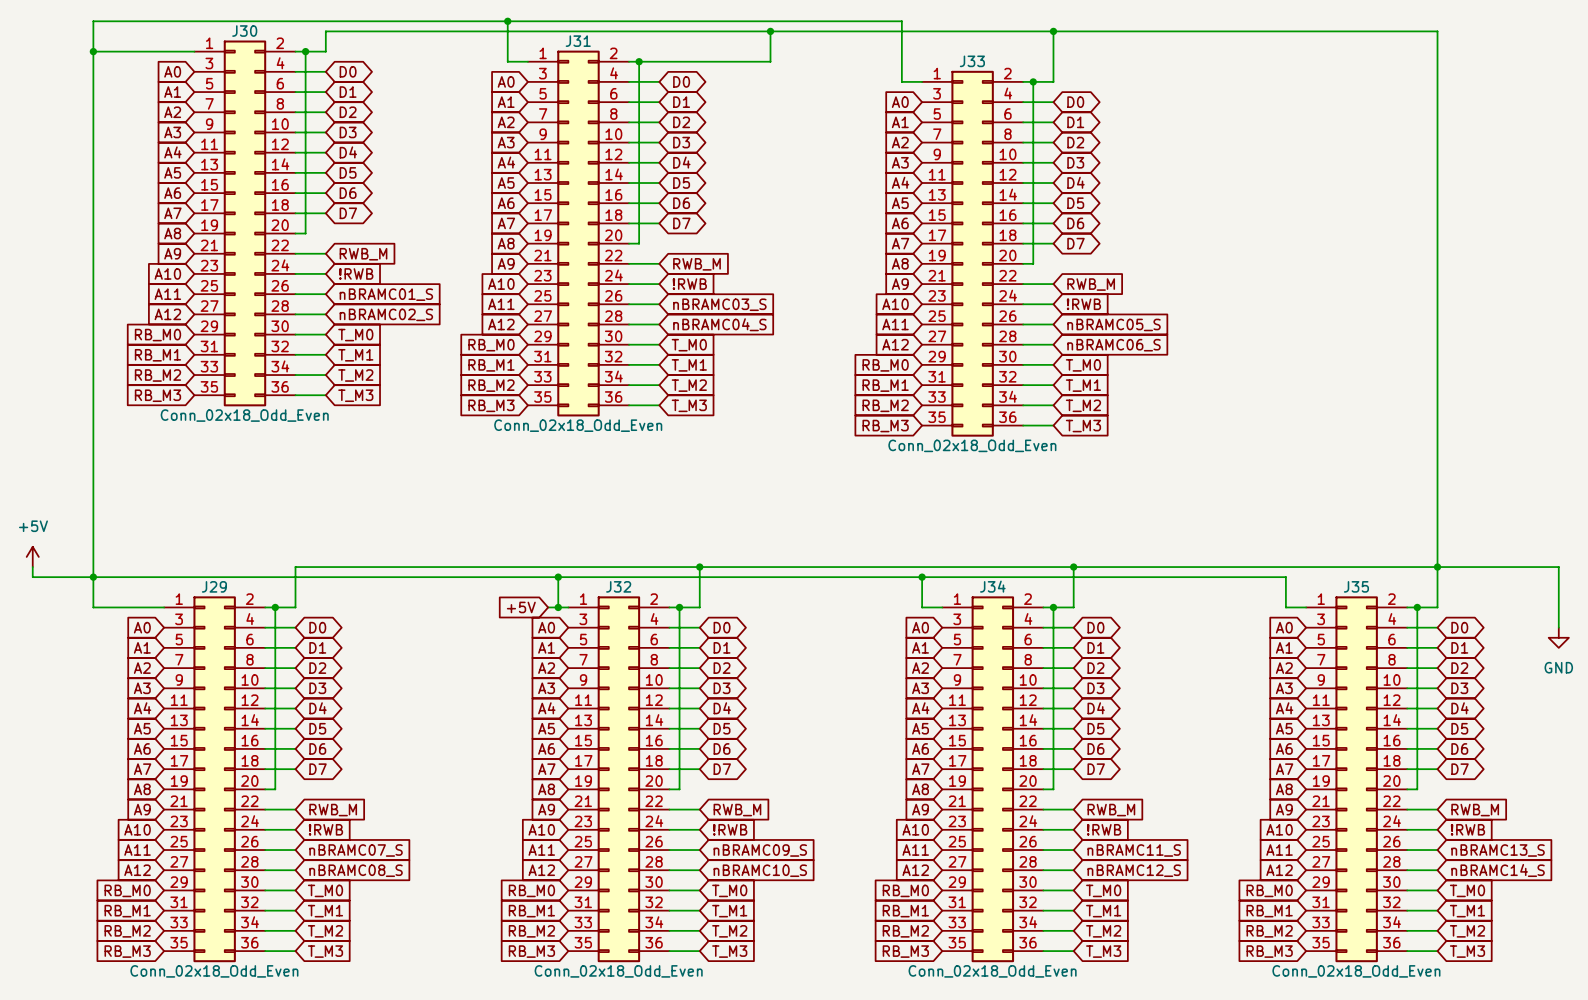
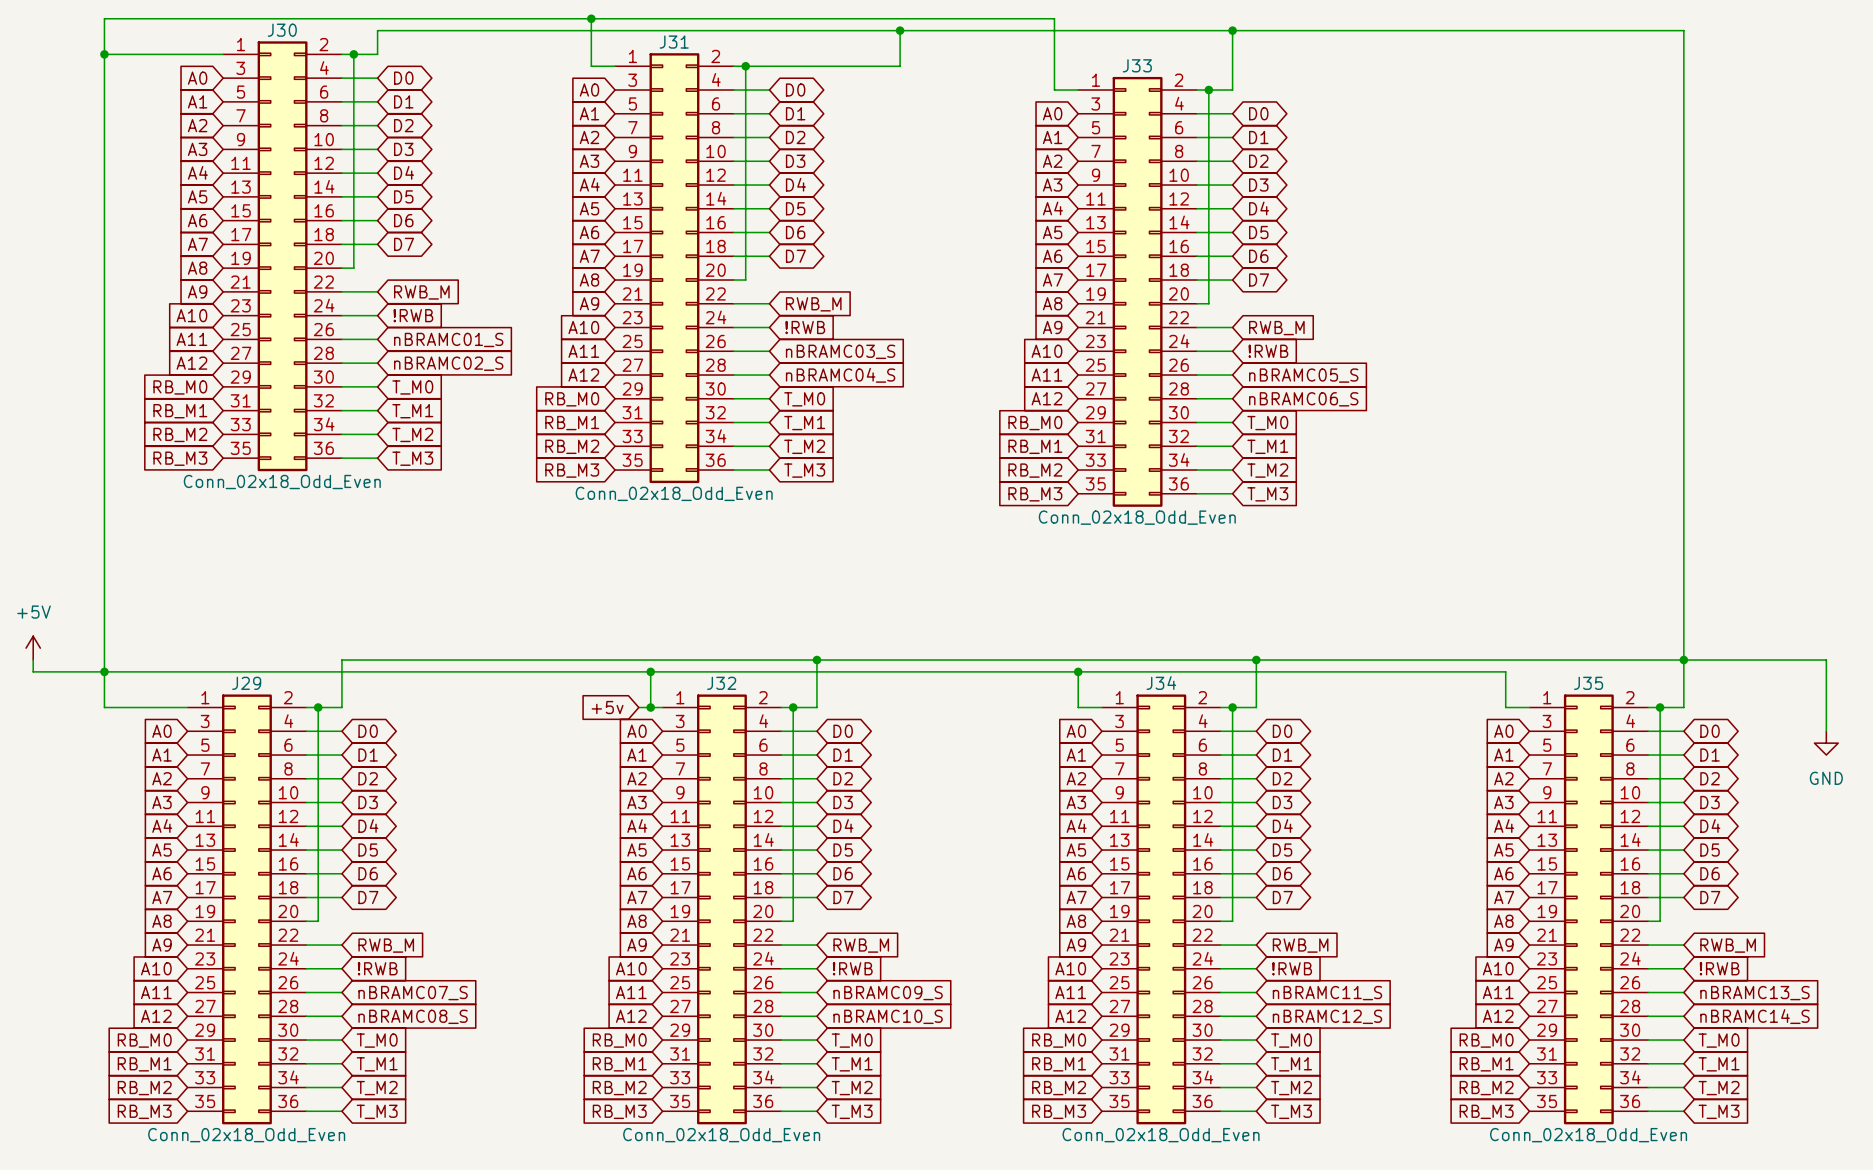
global label: +5V (521, 607) -> +5v (607, 707)

